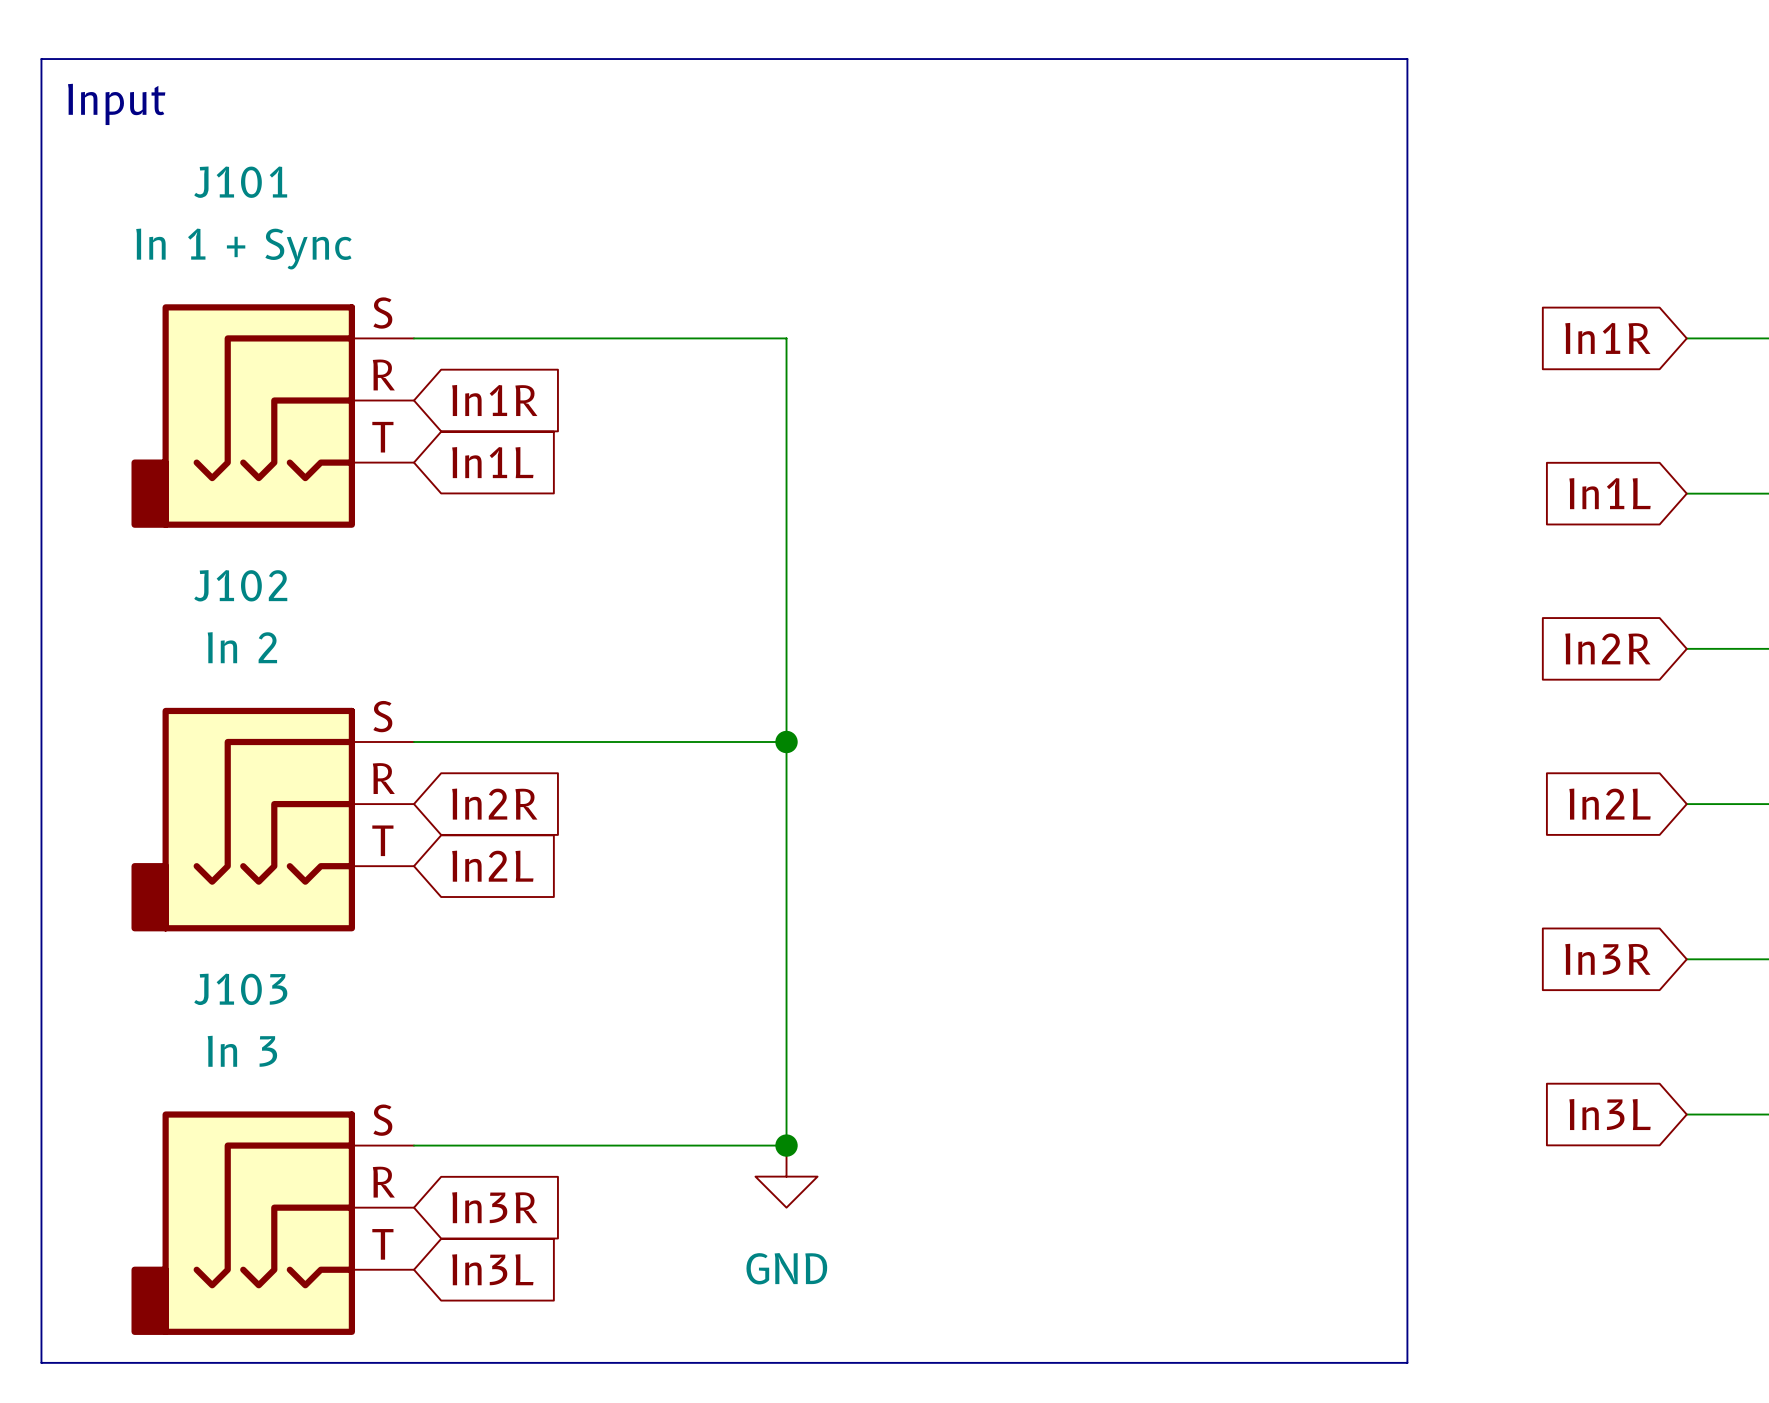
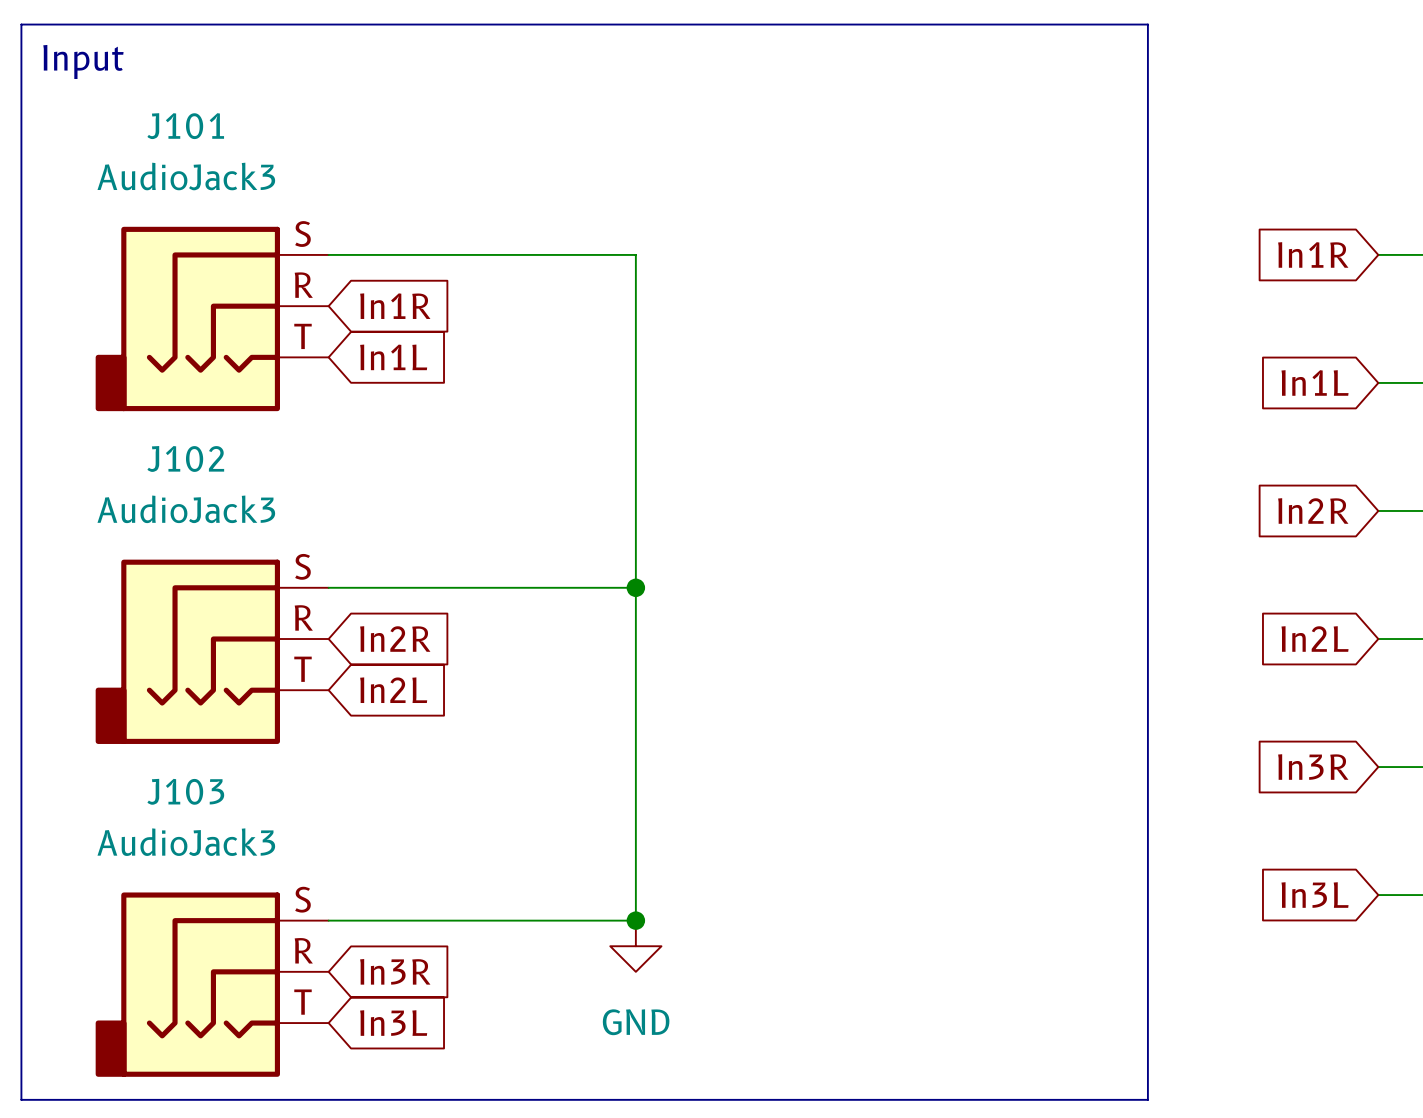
J101 value: In 1 + Sync (243, 249) -> AudioJack3 (186, 176)
J102 value: In 2 (242, 647) -> AudioJack3 (186, 509)
J103 value: In 3 (242, 1051) -> AudioJack3 (186, 842)

